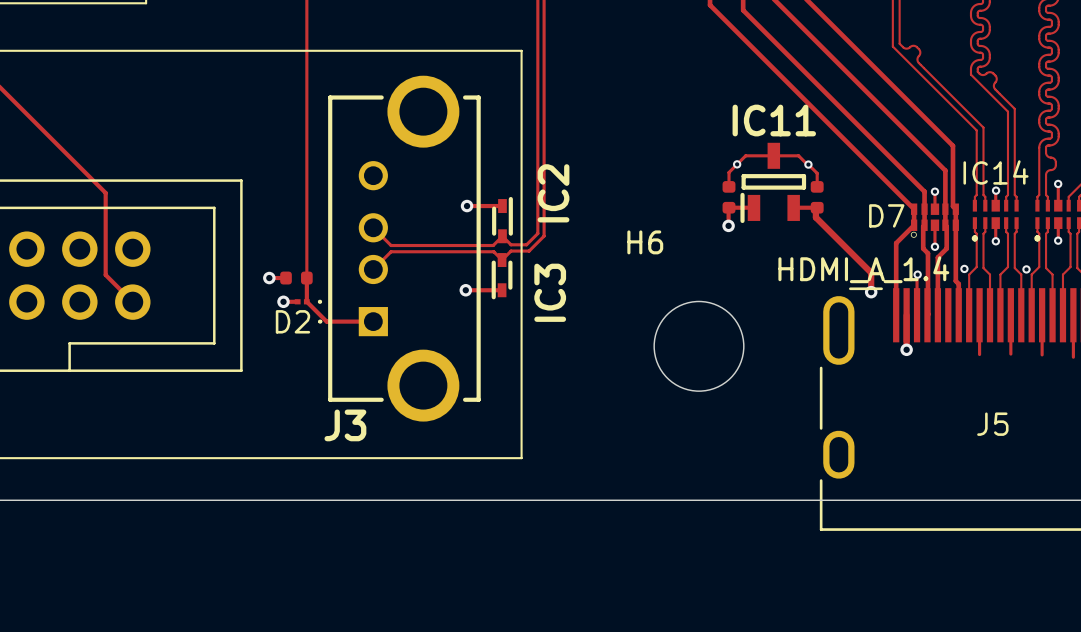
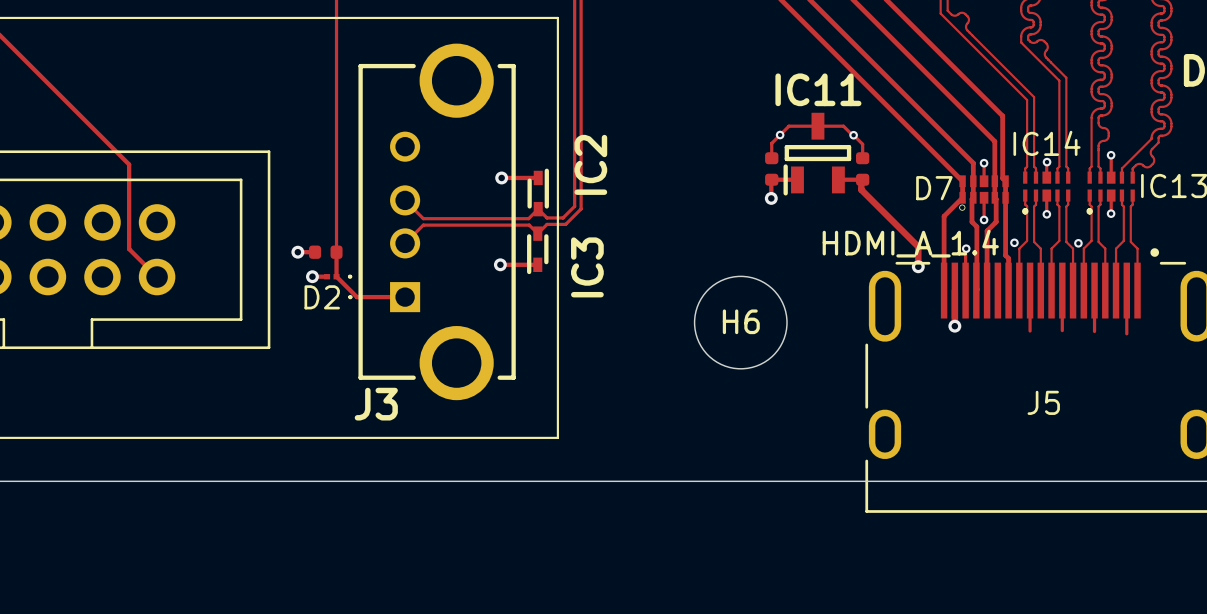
H6 name position: H6 (645, 242) -> H6 (741, 321)

